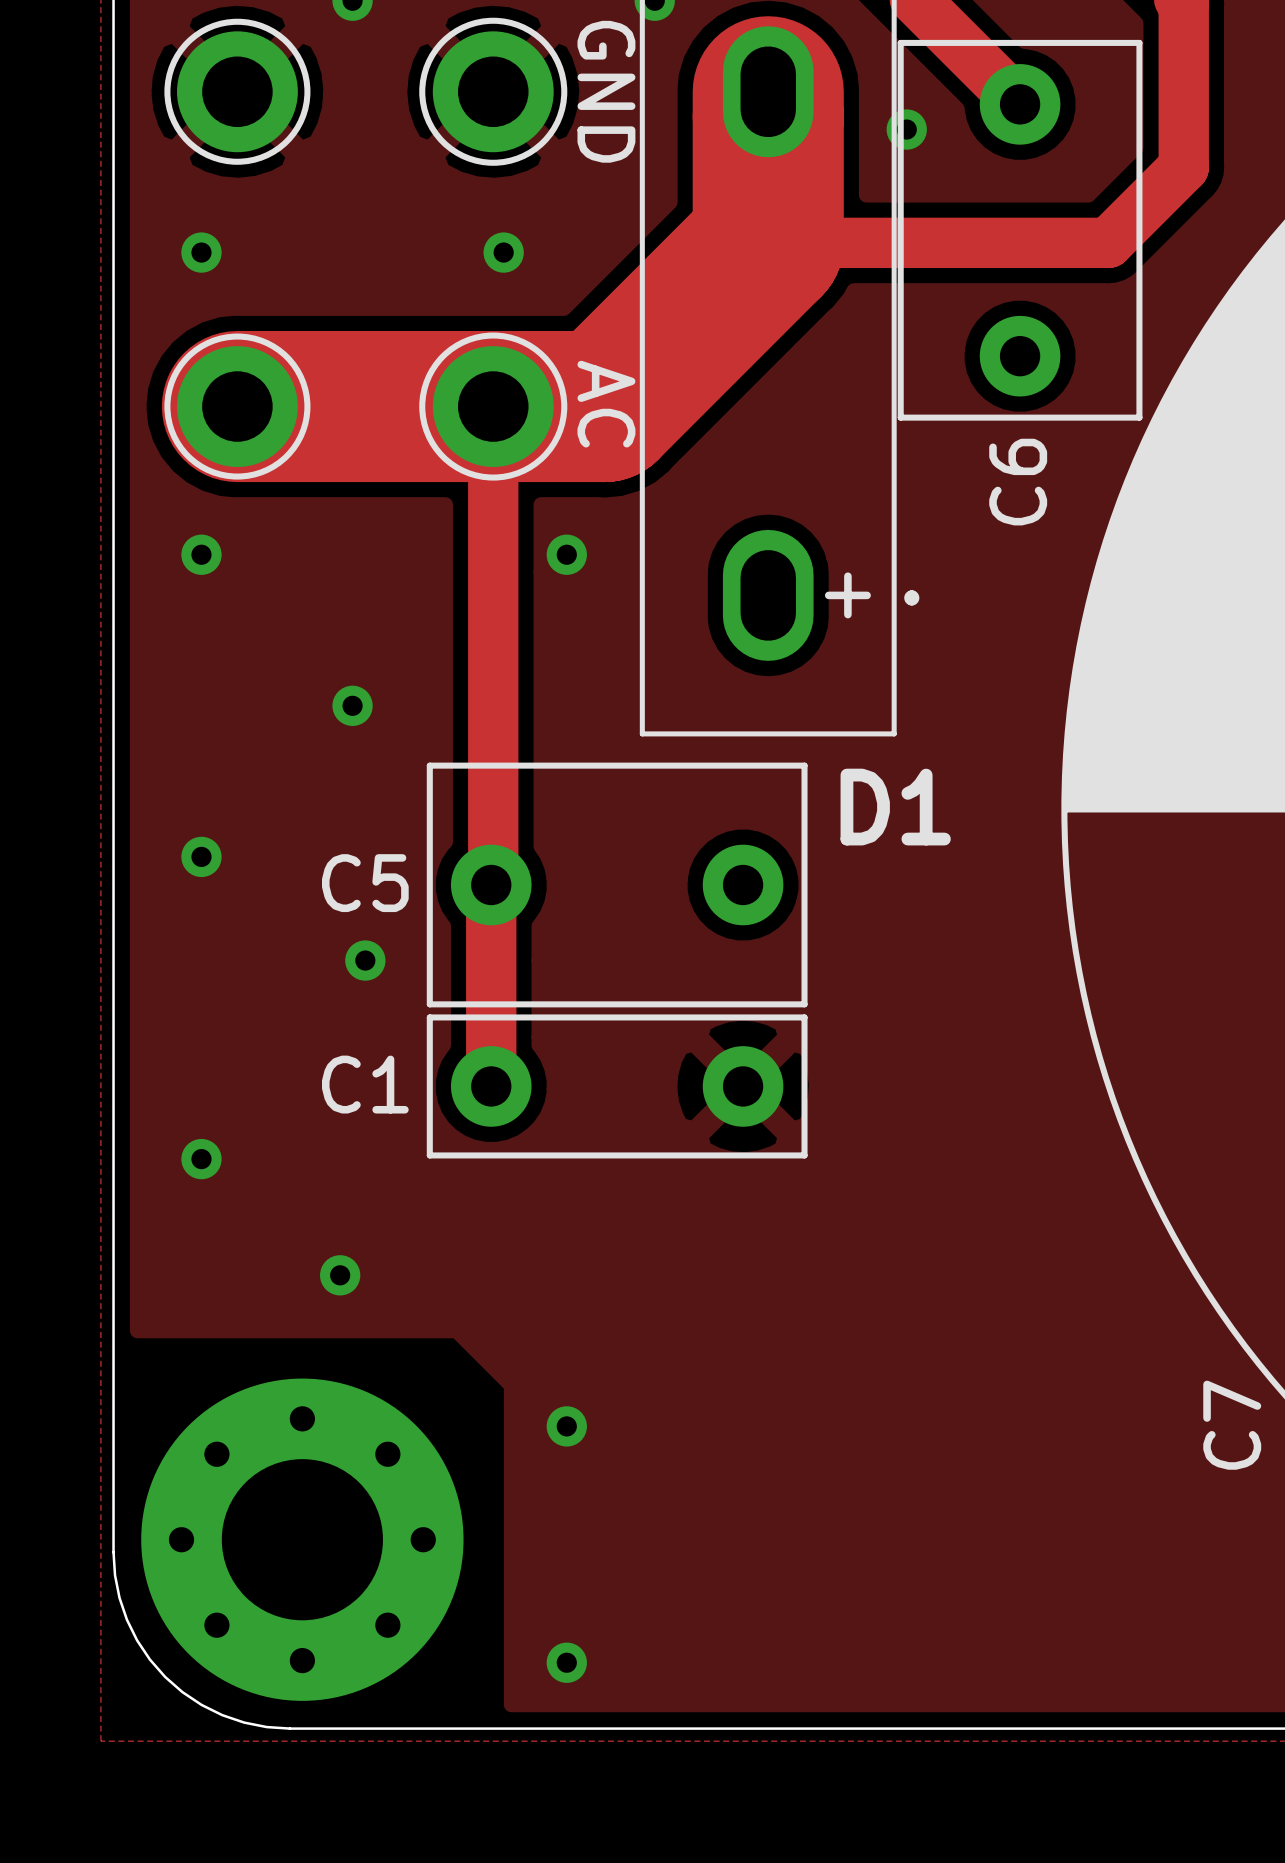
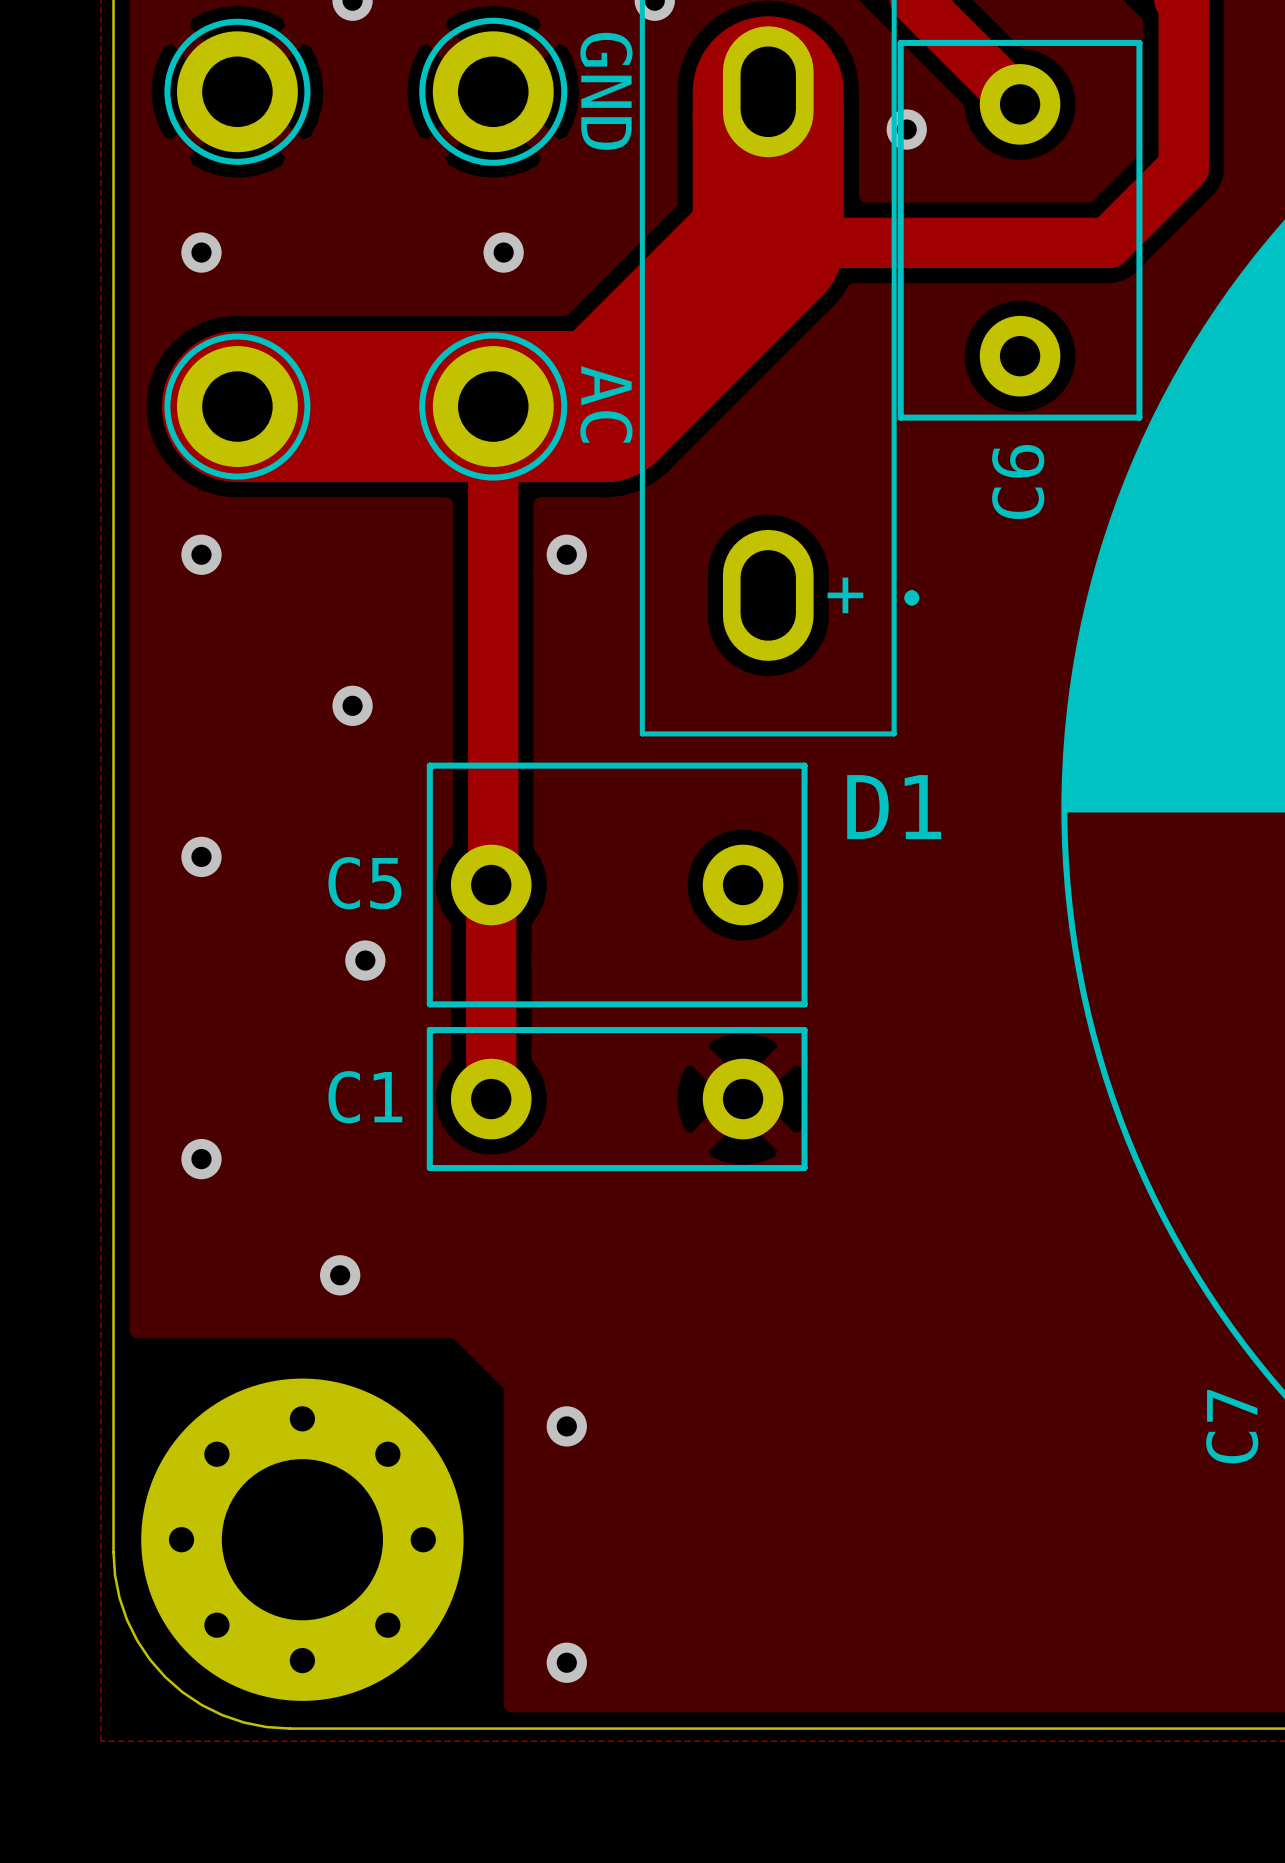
C1 position: (617, 1086) -> (617, 1099)

